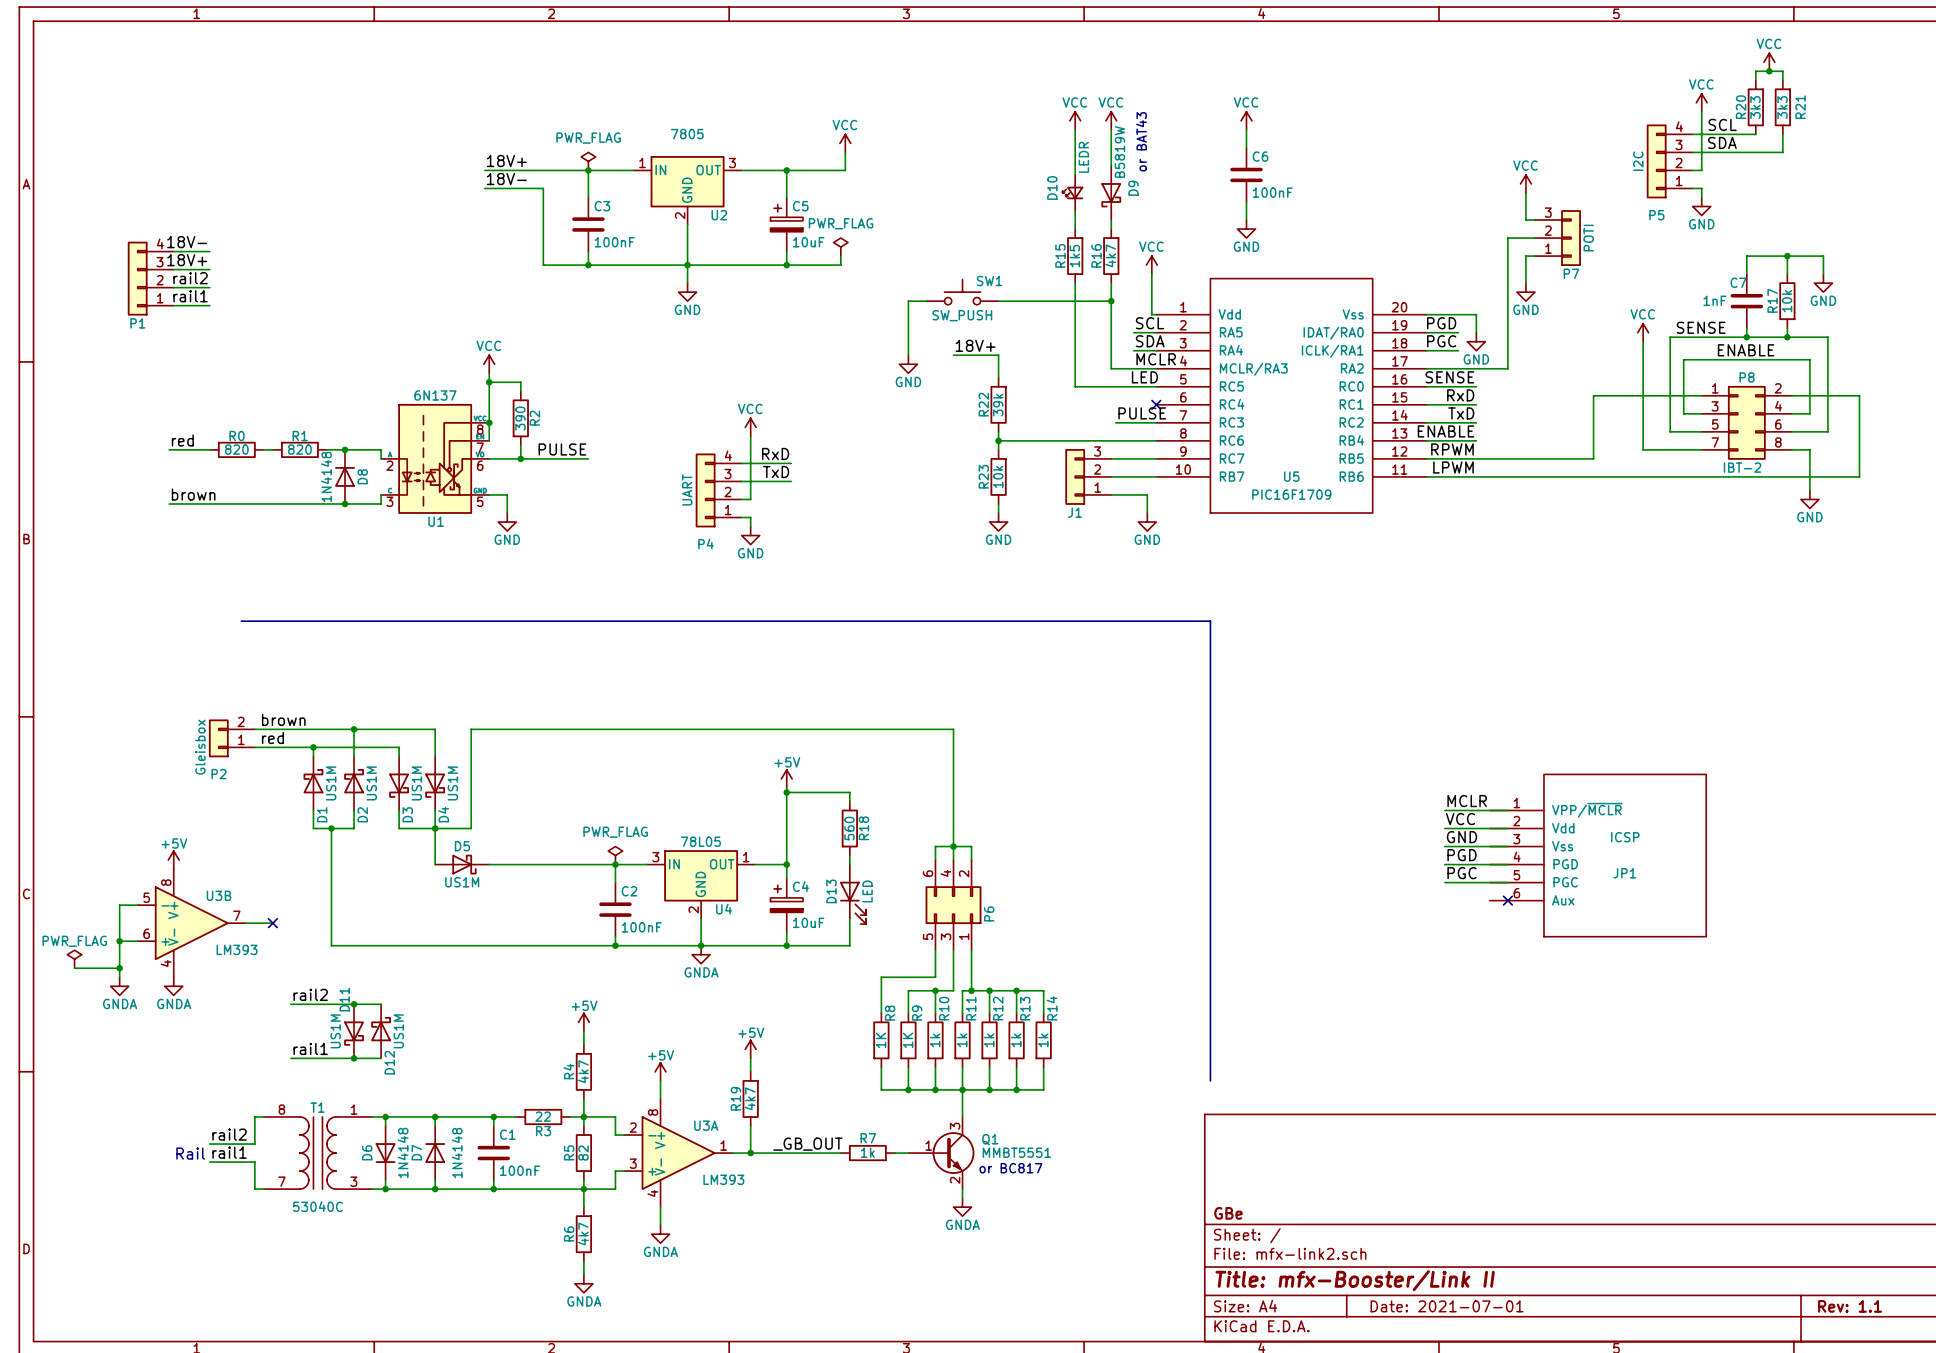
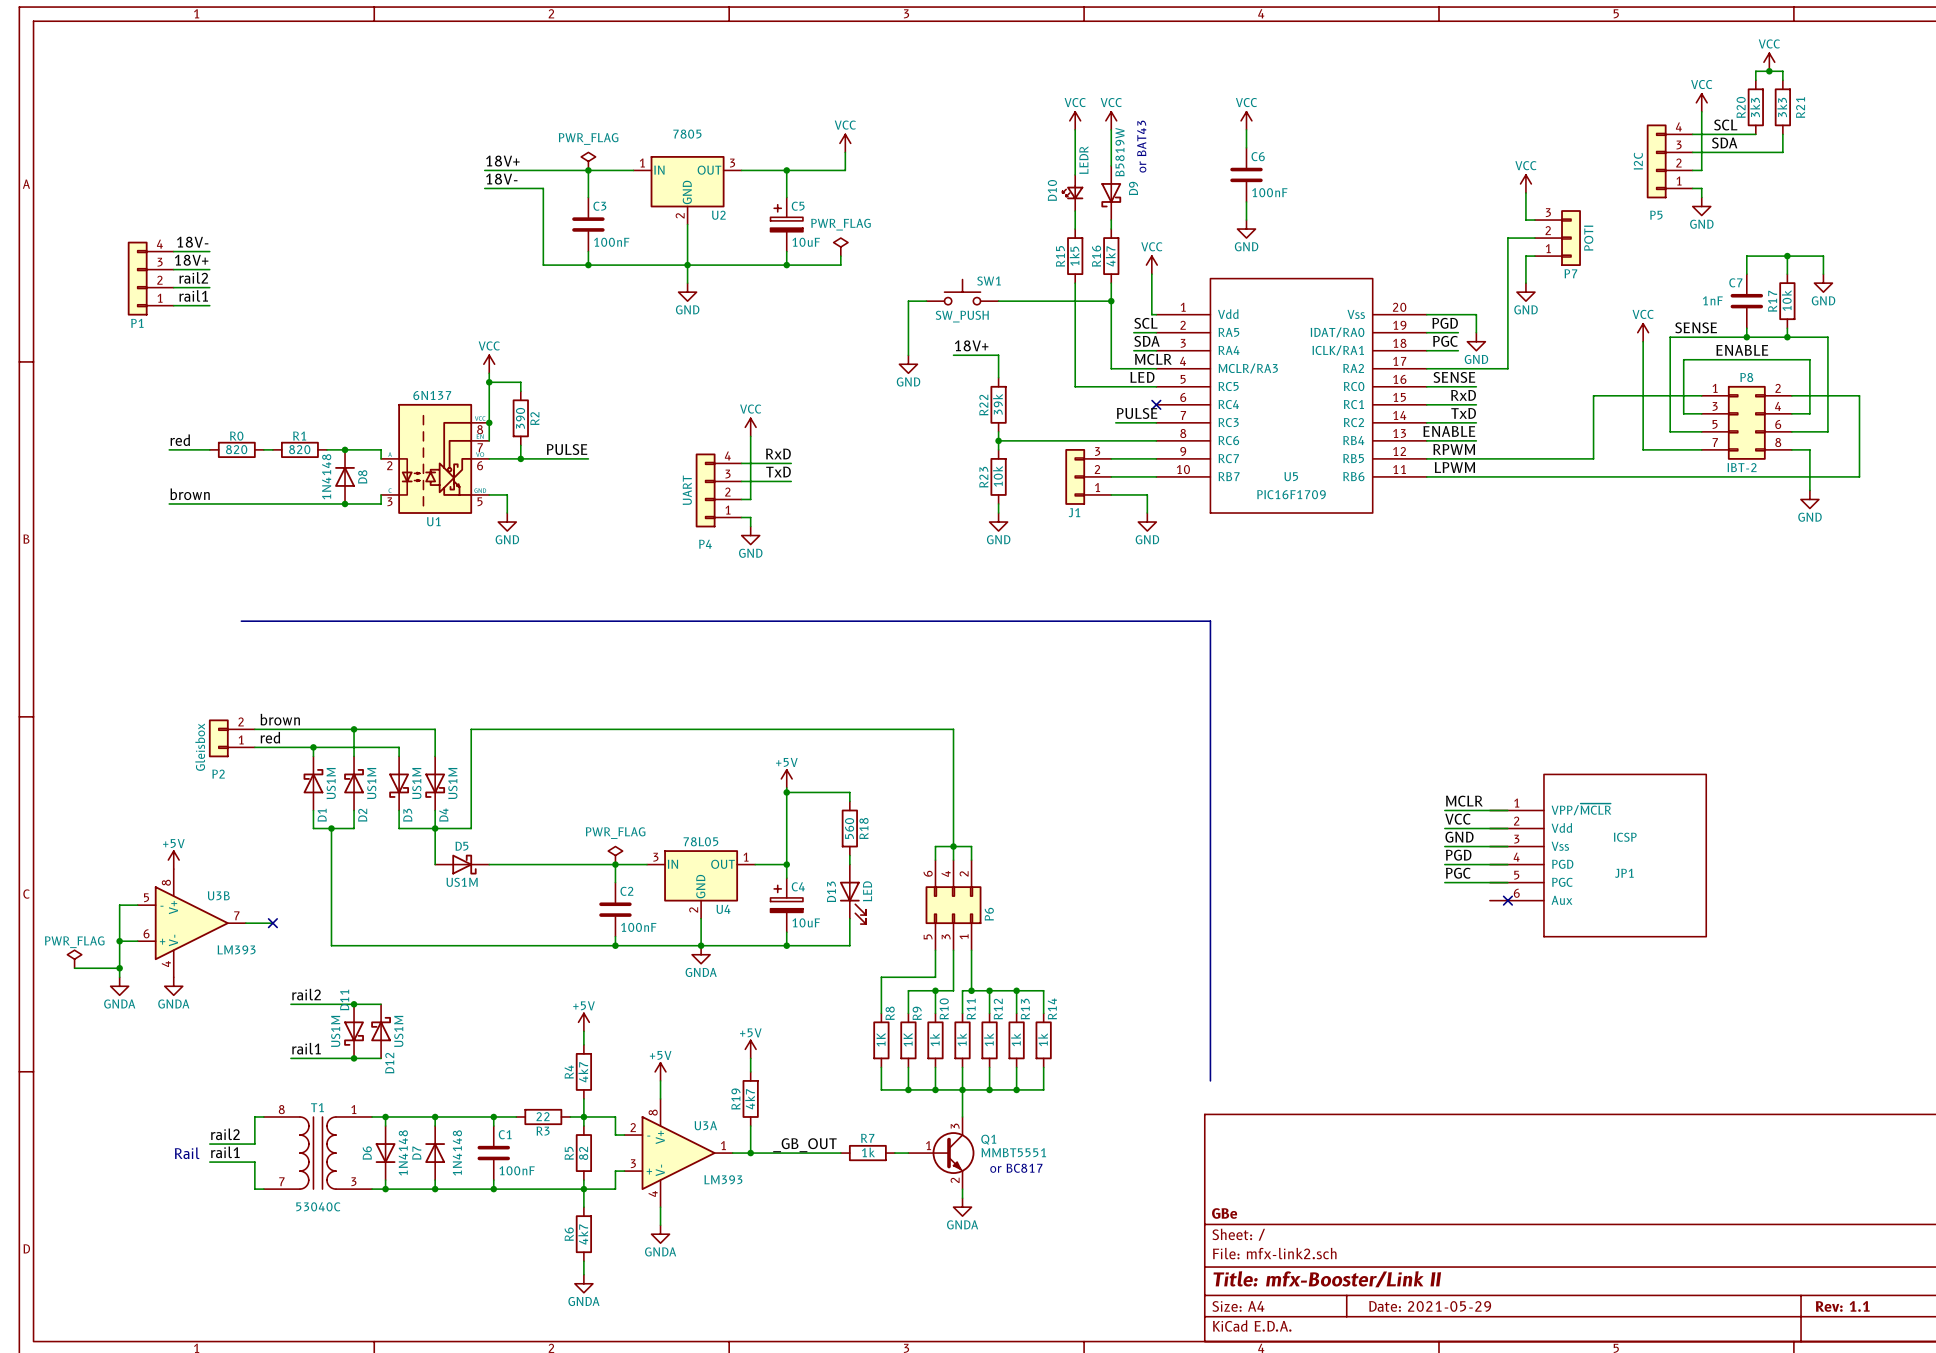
title block: Date: 2021-07-01 (1447, 1306) -> Date: 2021-05-29 (1430, 1306)

